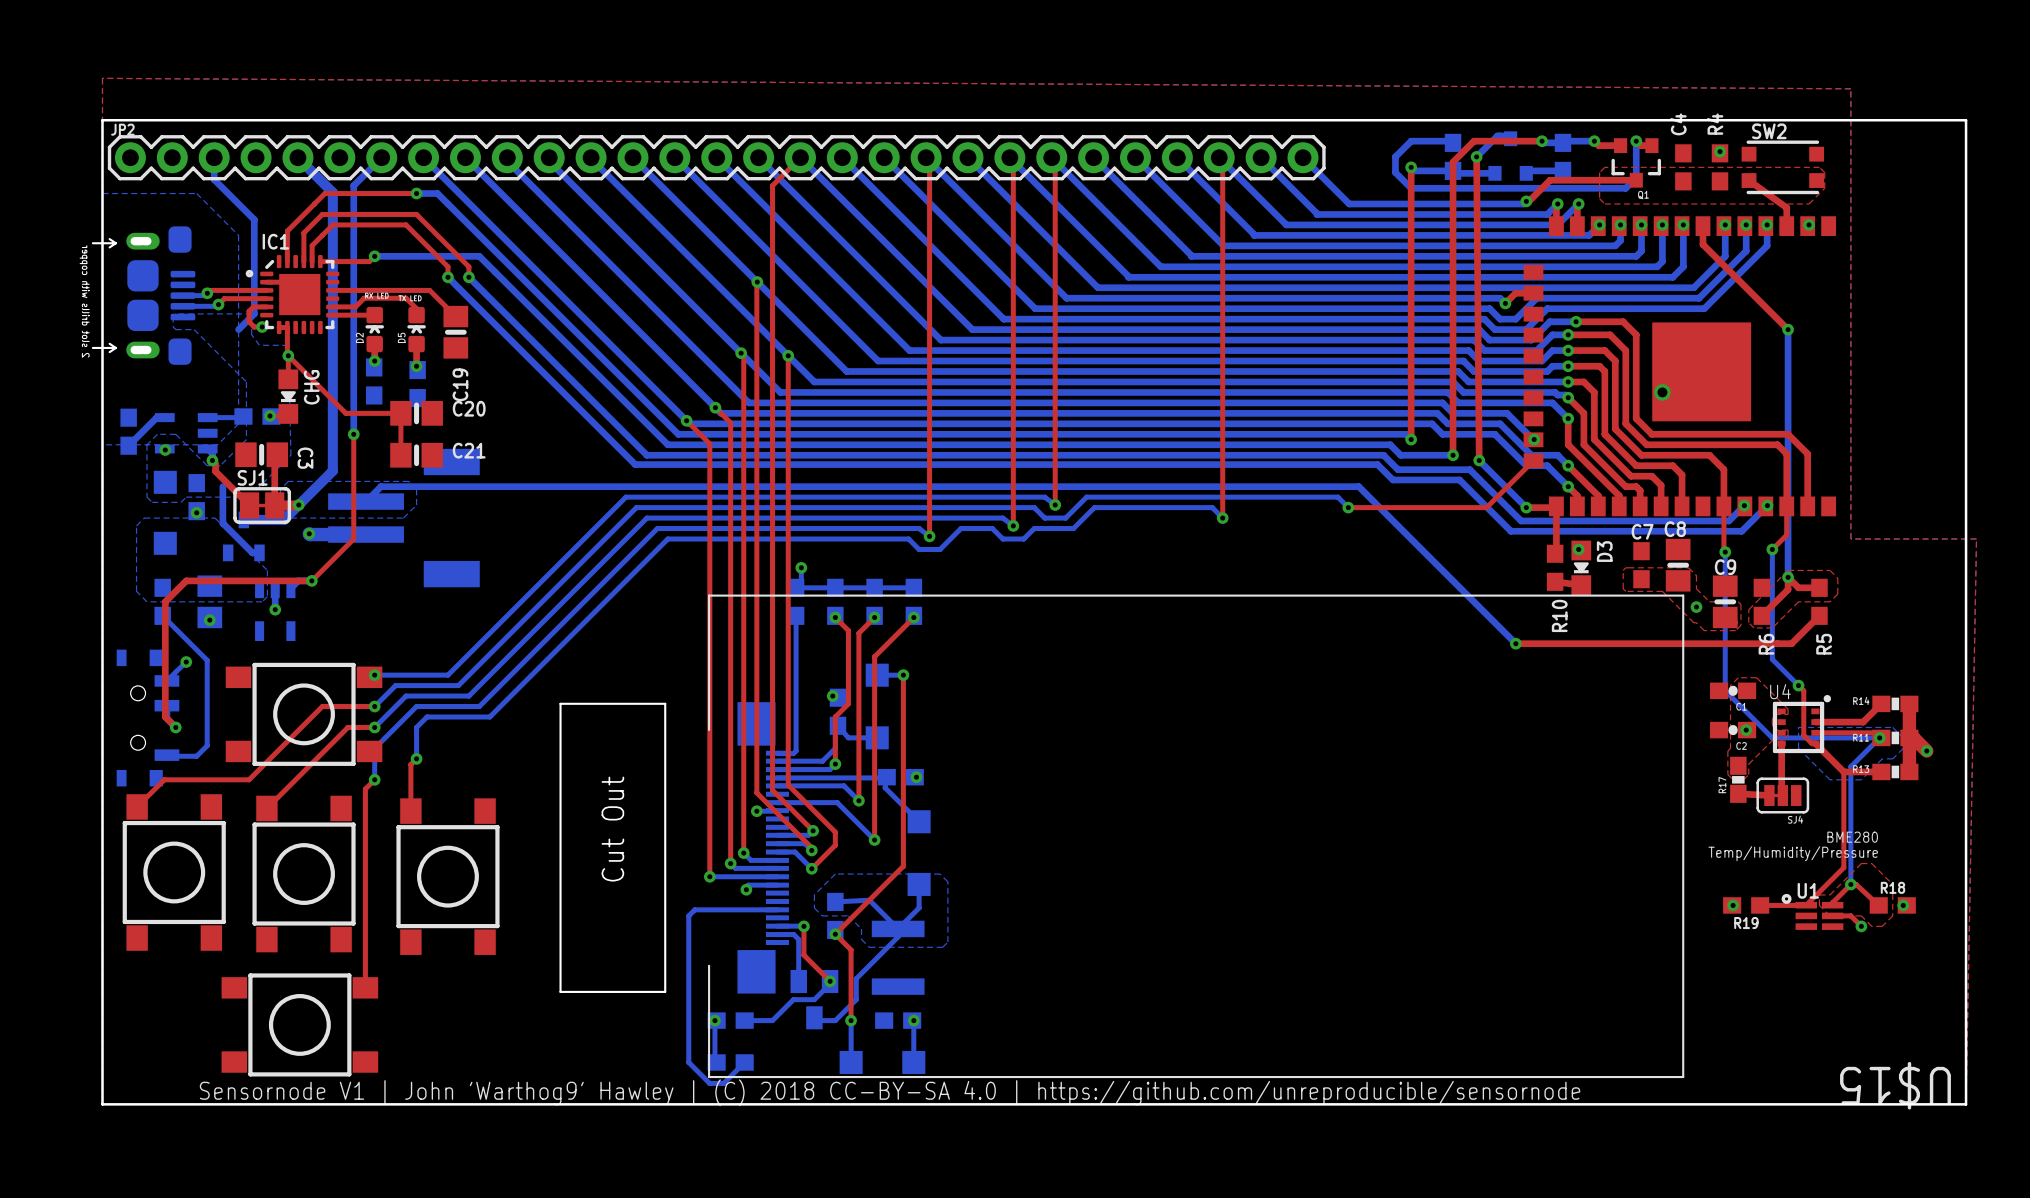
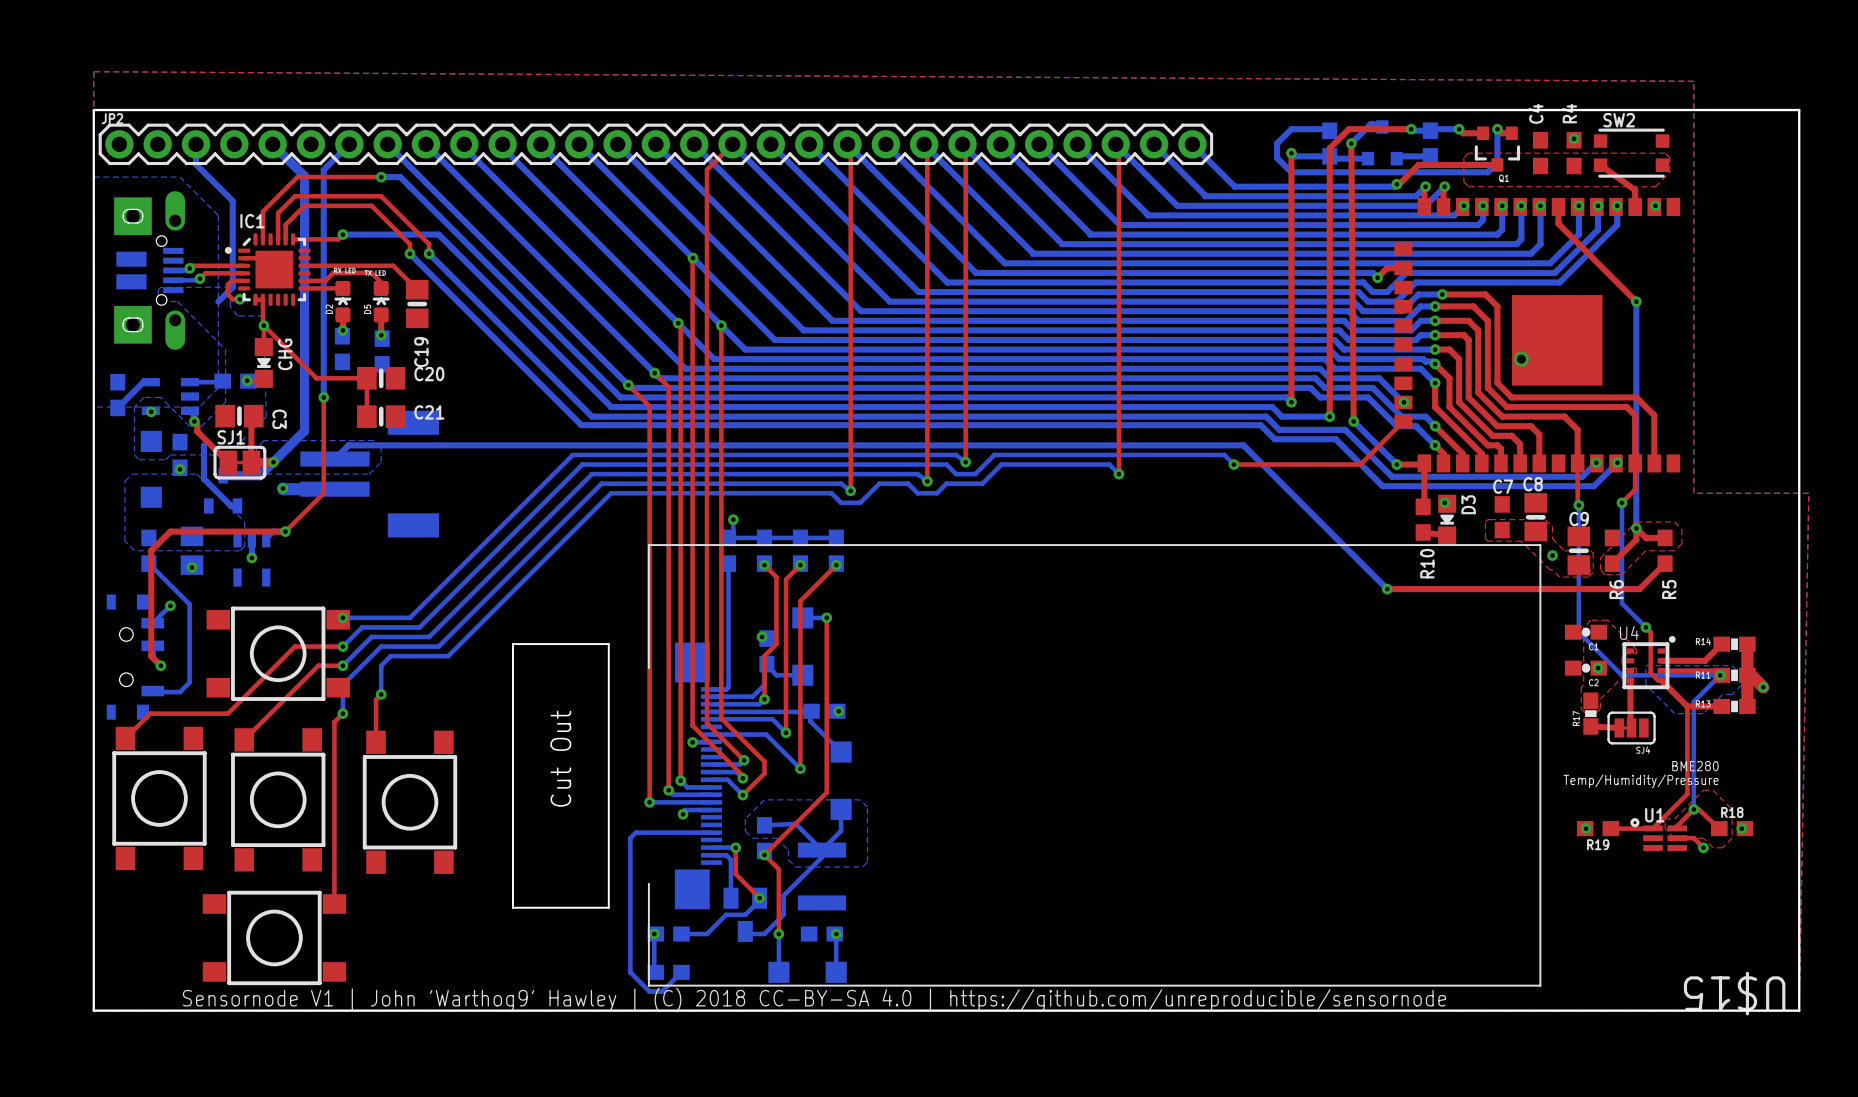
part: (143, 295) -> none
part: none -> (149, 270)

